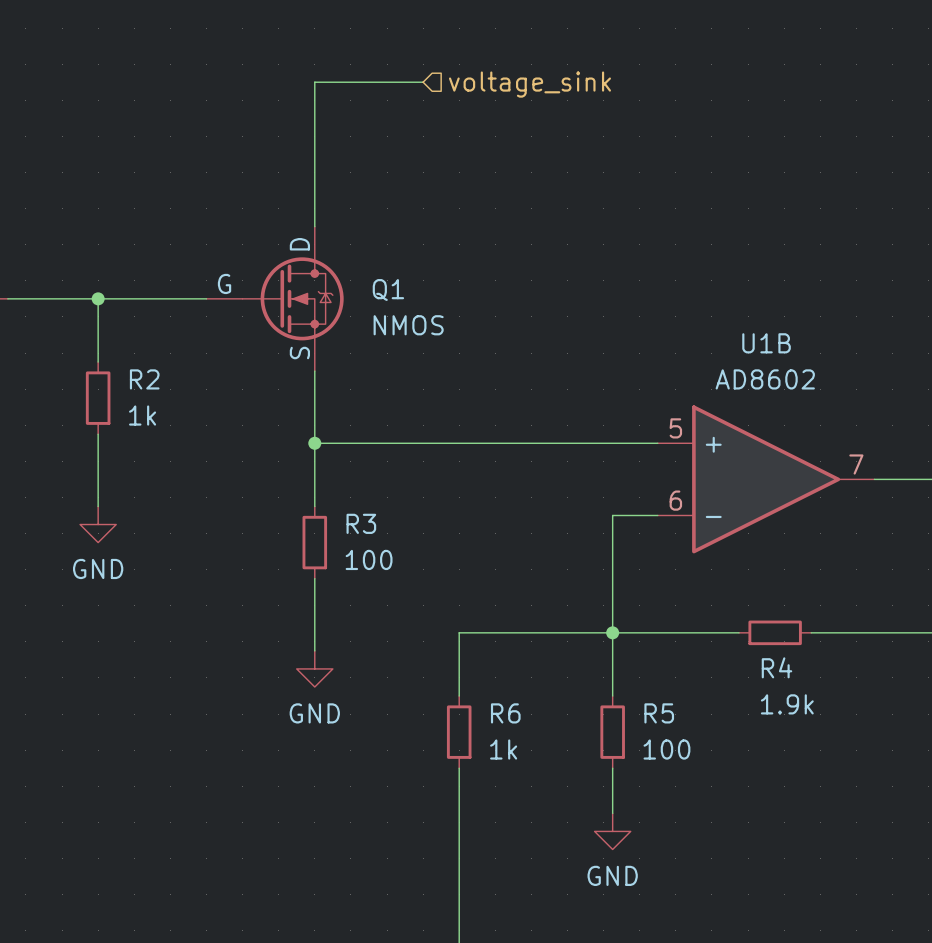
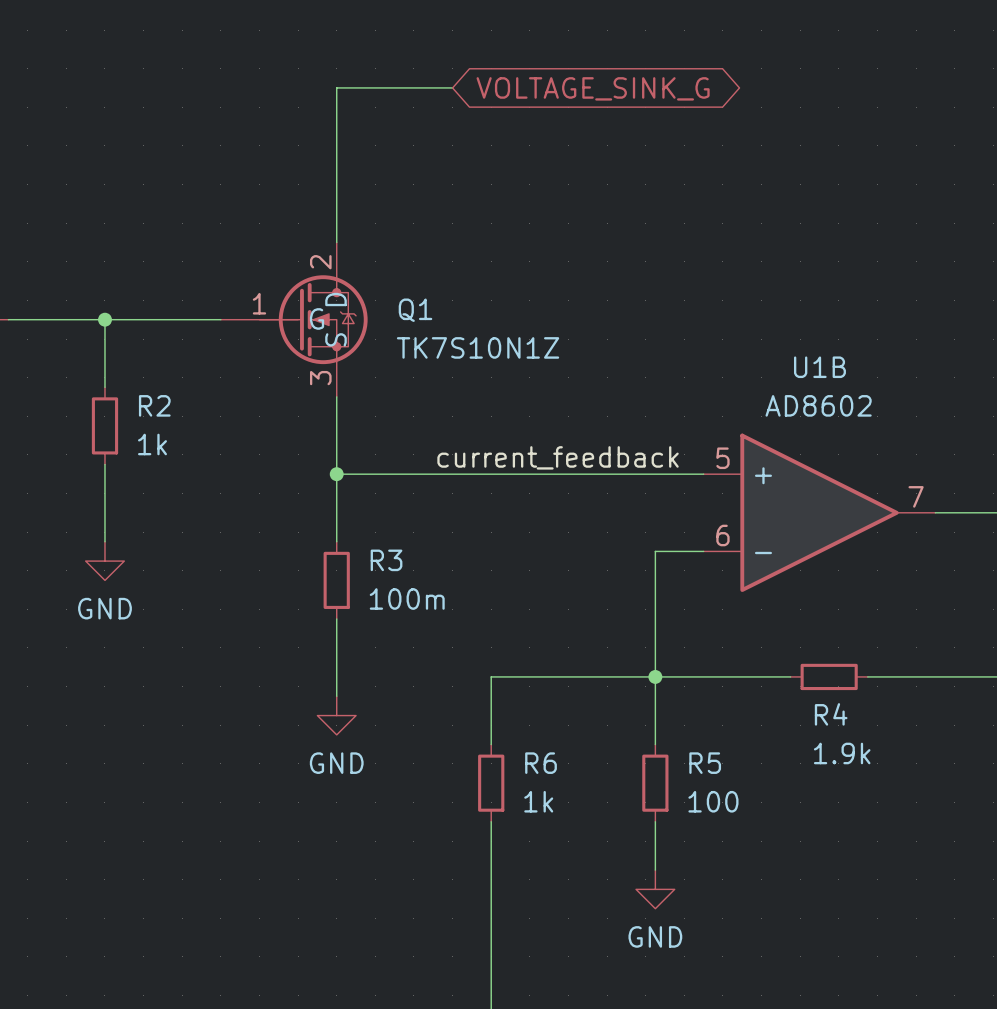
global label: none -> VOLTAGE_SINK_G (593, 88)
hierarchical label: voltage_sink (529, 84) -> none
Q1 symbol: [206, 226, 344, 372] -> [220, 242, 368, 397]
Q1 value: NMOS (408, 325) -> TK7S10N1Z (478, 347)
label: none -> current_feedback (558, 457)
R3 value: 100 (369, 559) -> 100m (407, 598)

